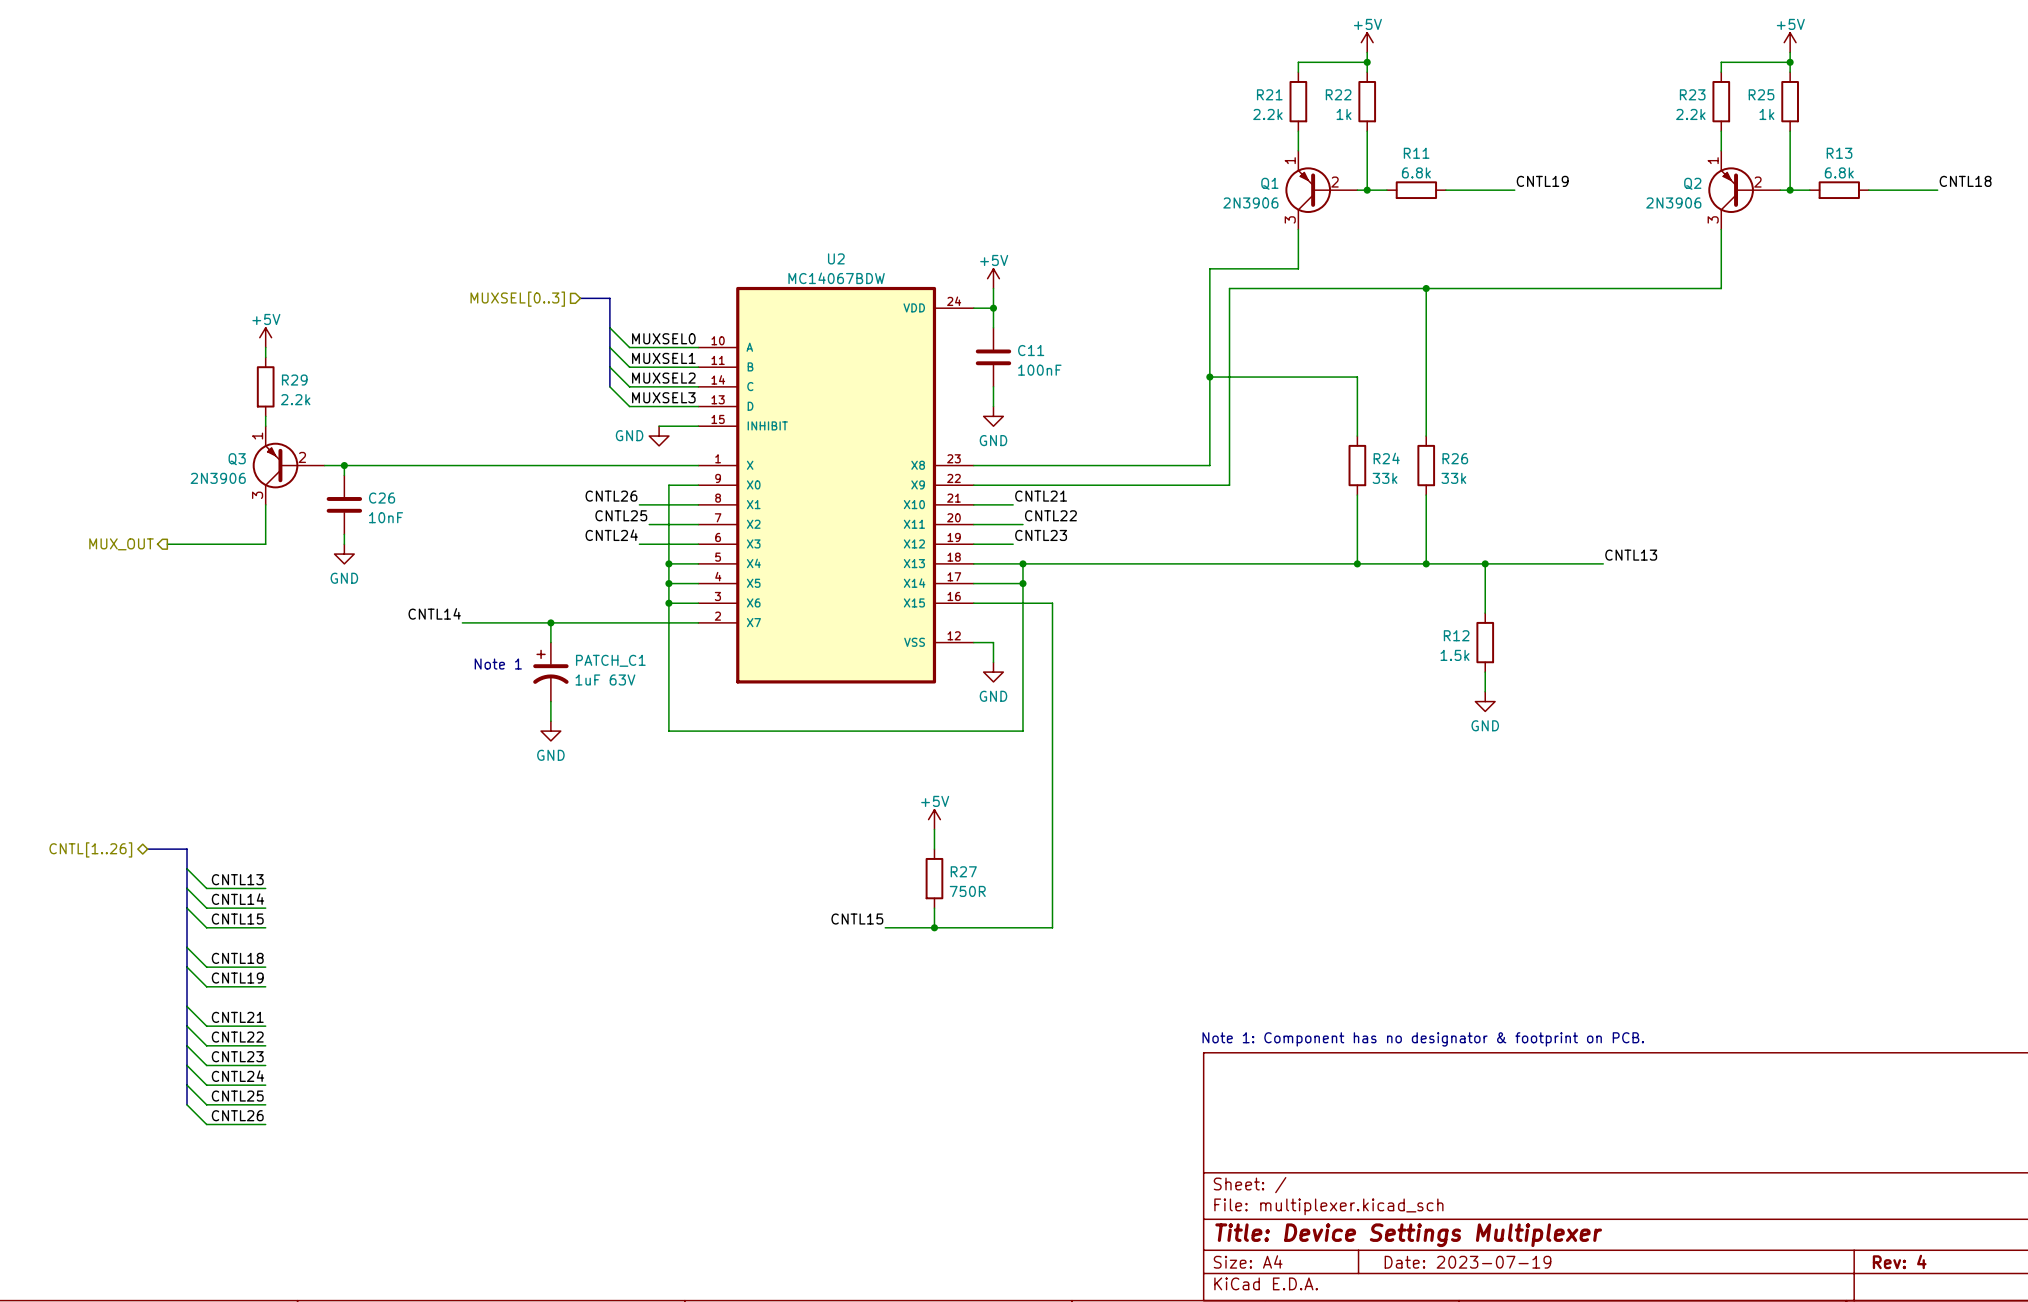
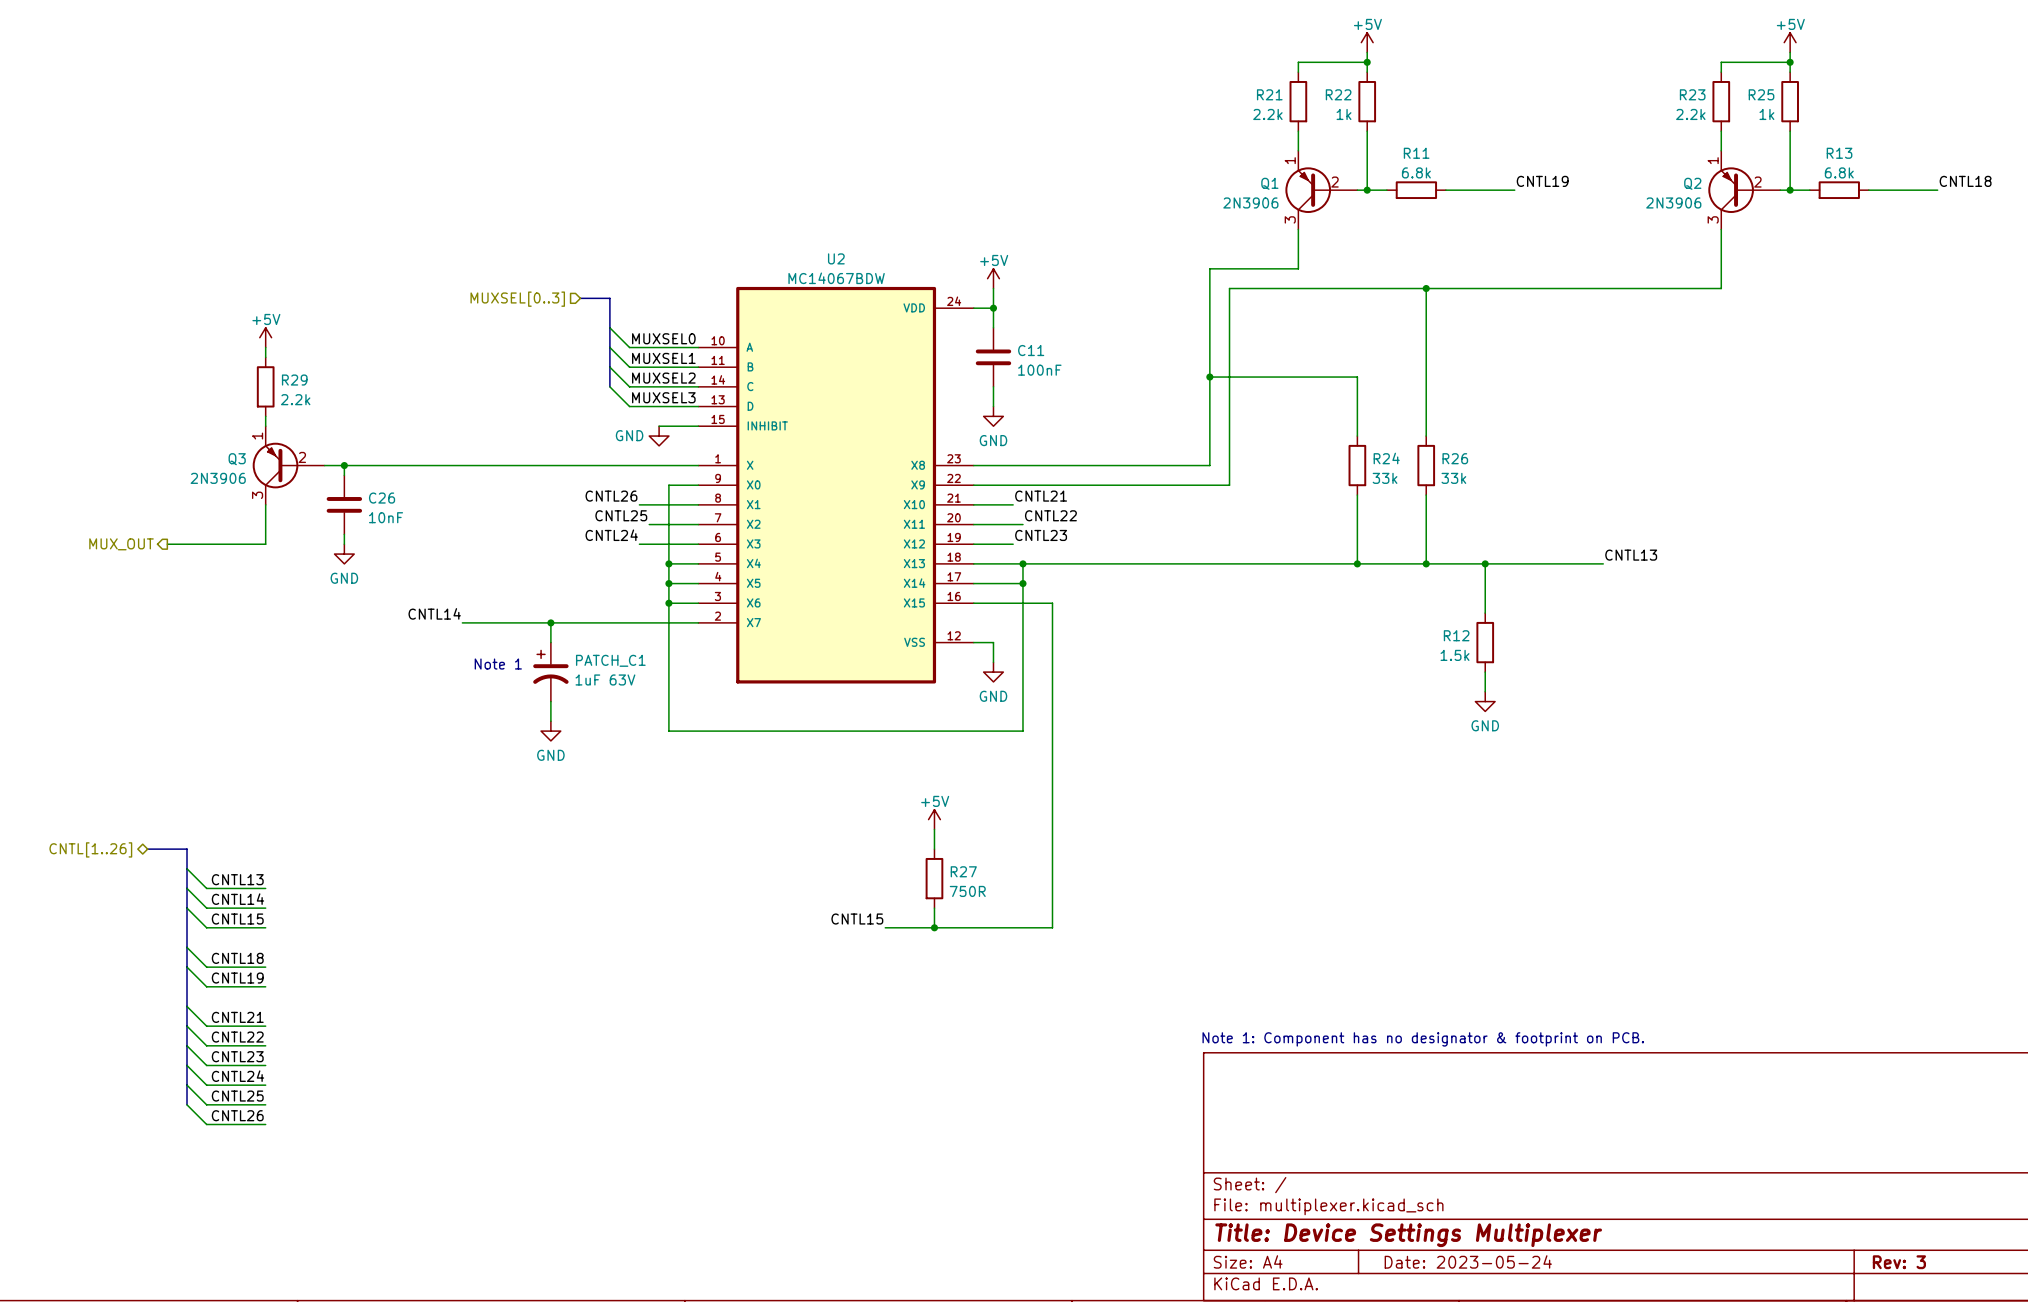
title block: Rev: 4 (1899, 1261) -> Rev: 3 (1899, 1262)
title block: Date: 2023-07-19 (1468, 1262) -> Date: 2023-05-24 (1468, 1261)

